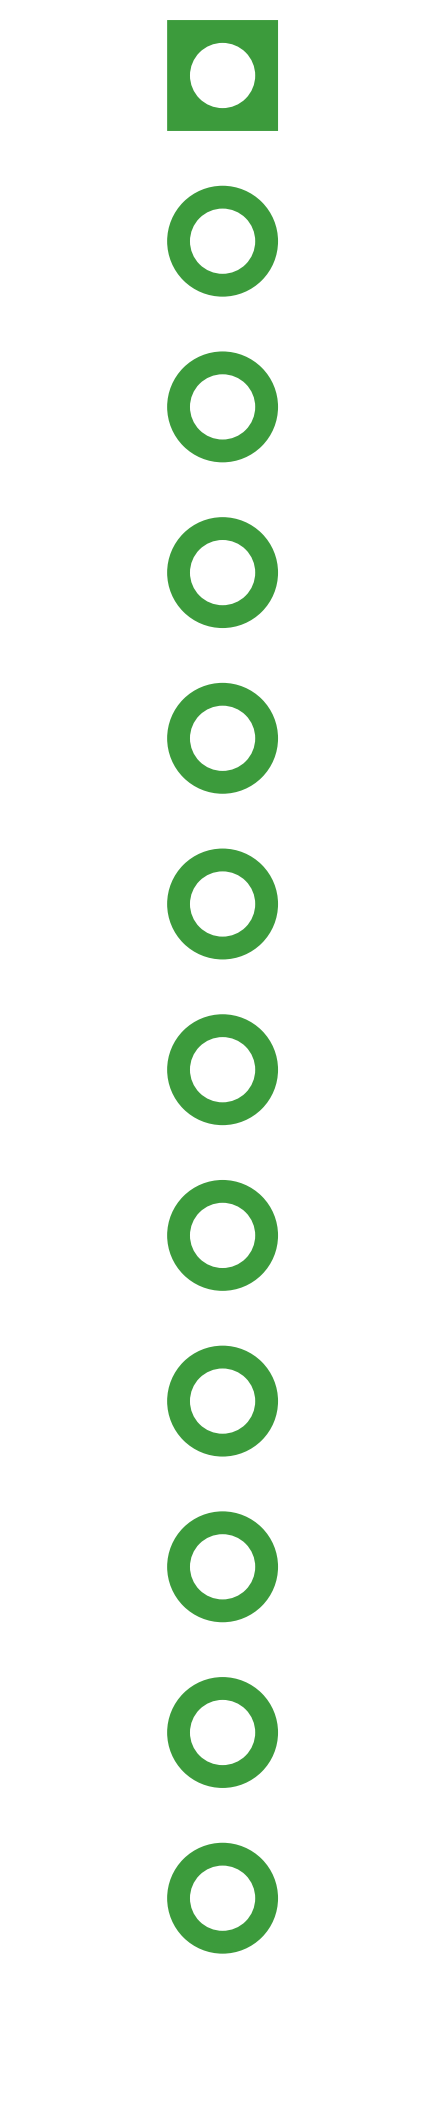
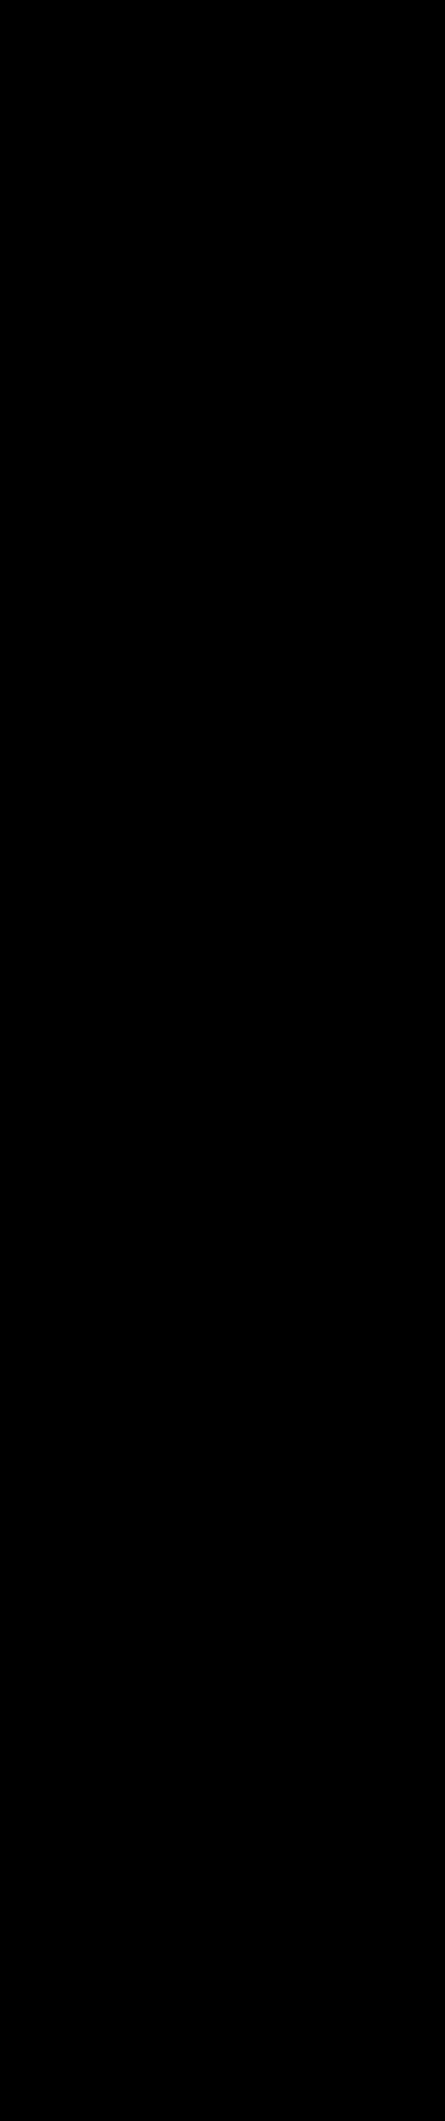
part: (222, 986) -> none

